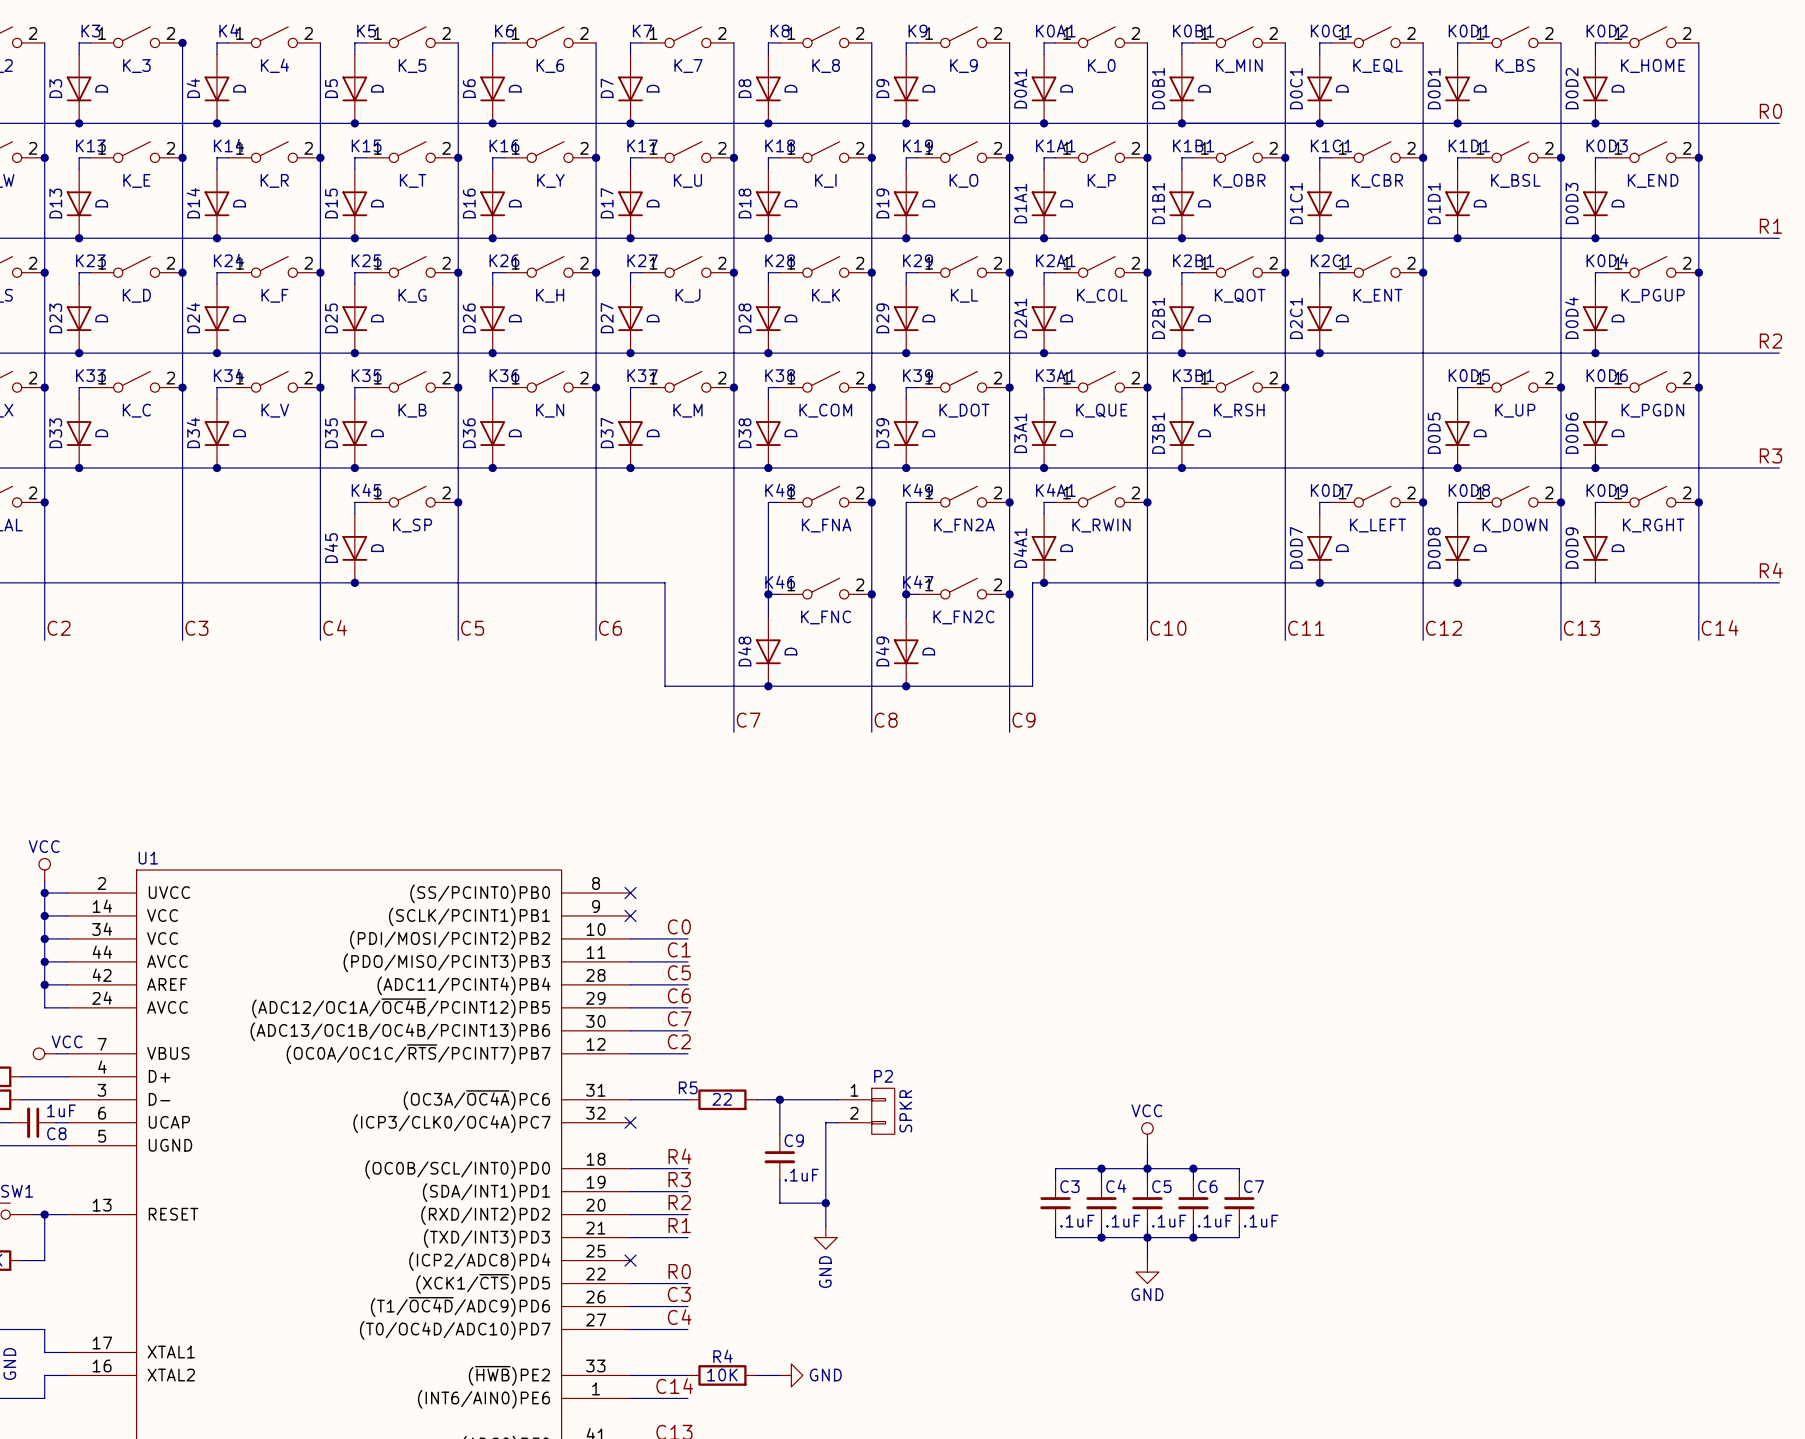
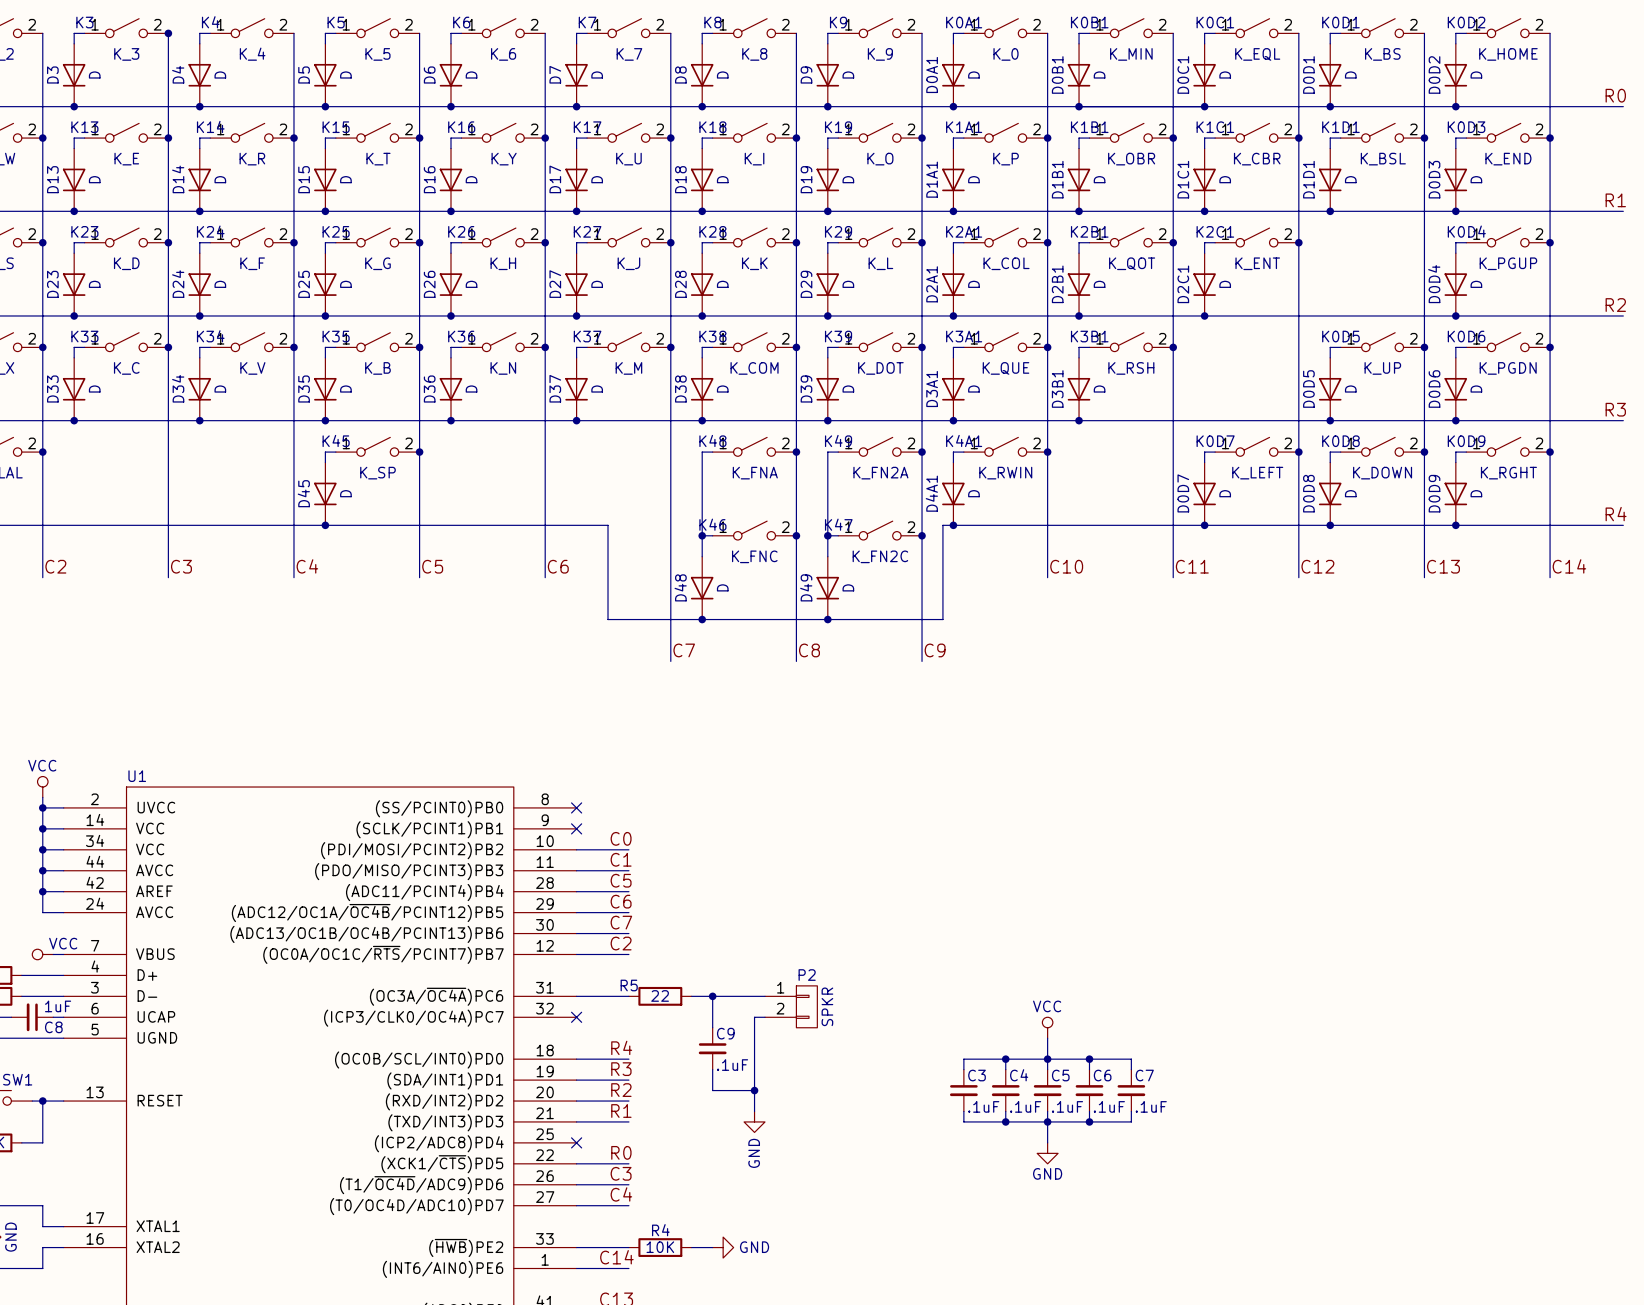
junction: none -> (1455, 525)

